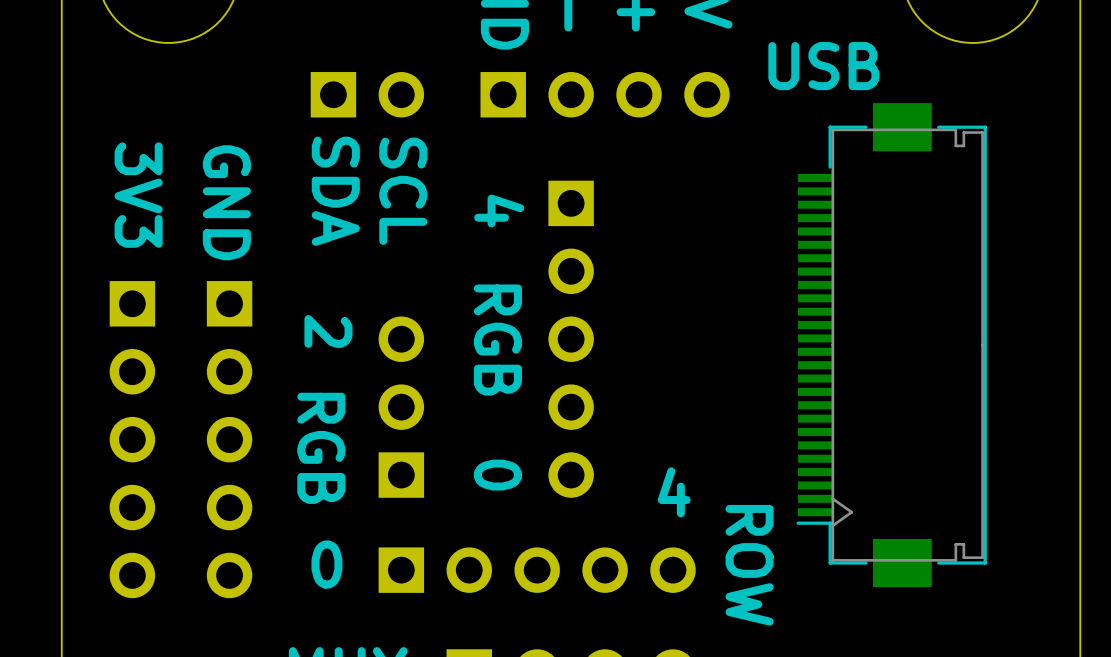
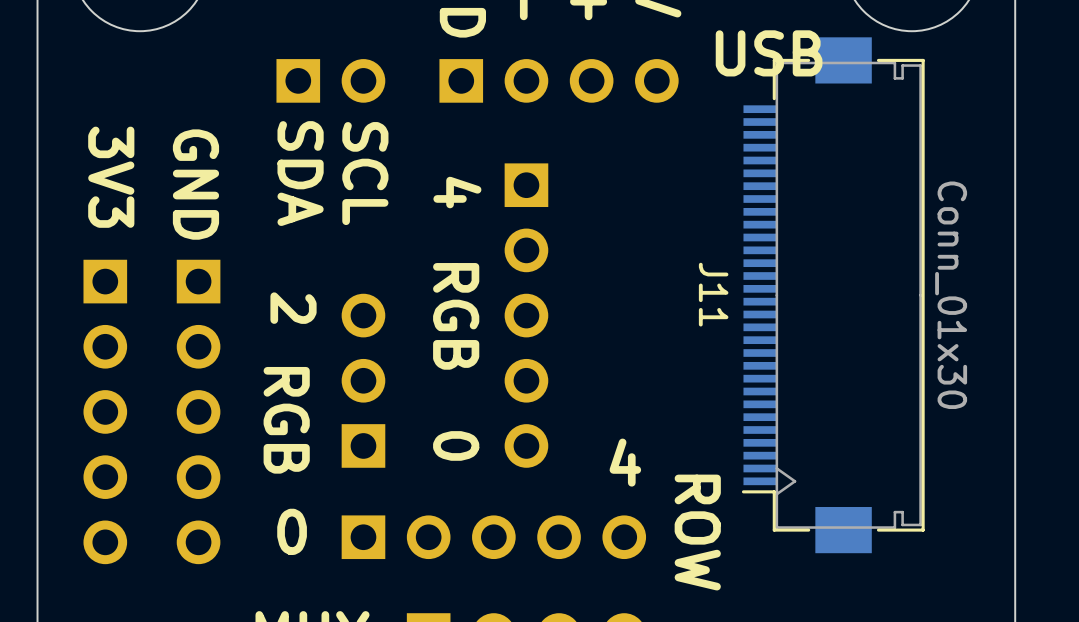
J11: none -> Conn_01x30 (833, 295)
part: (891, 345) -> none

